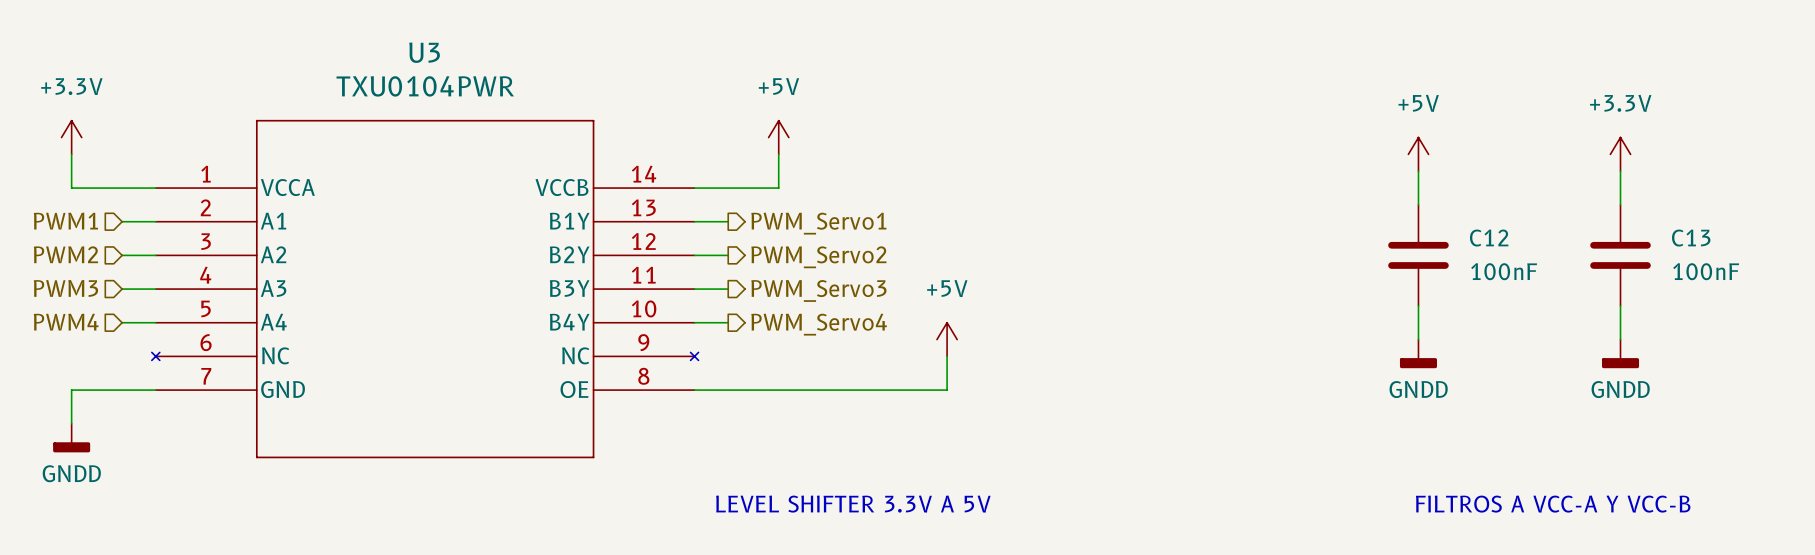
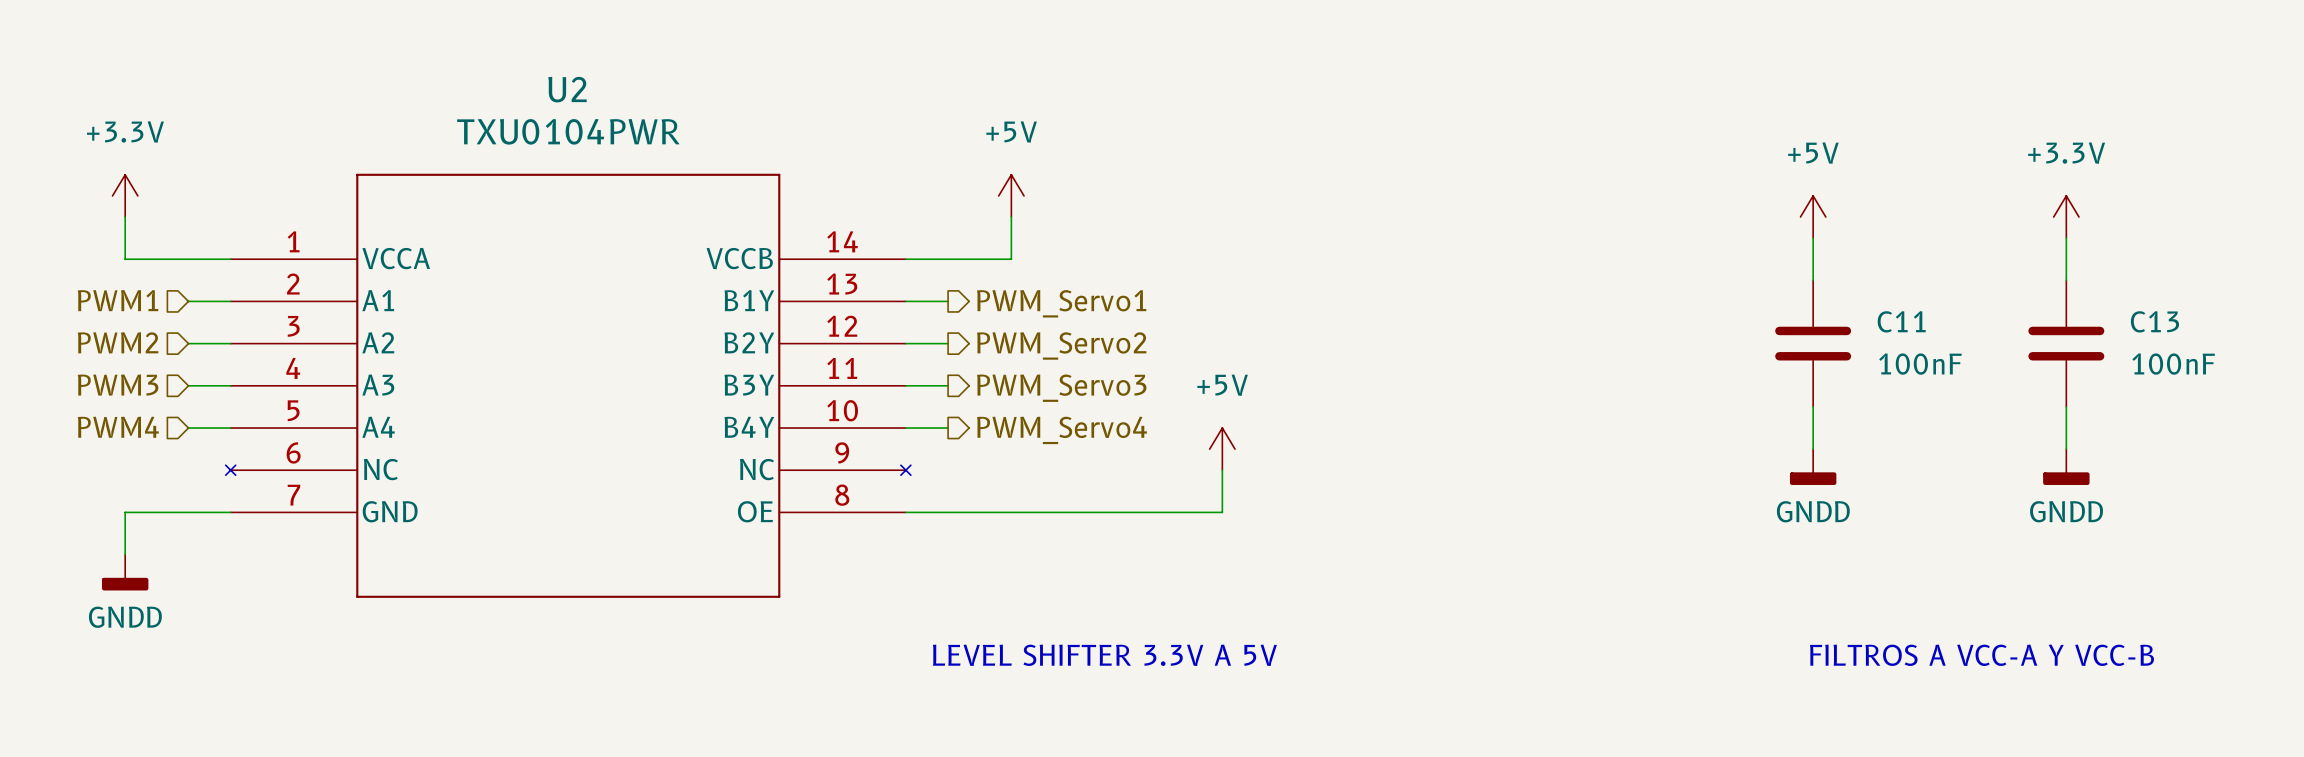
U3 name: U3 (424, 52) -> U2 (567, 89)
C12 name: C12 (1489, 238) -> C11 (1901, 321)

